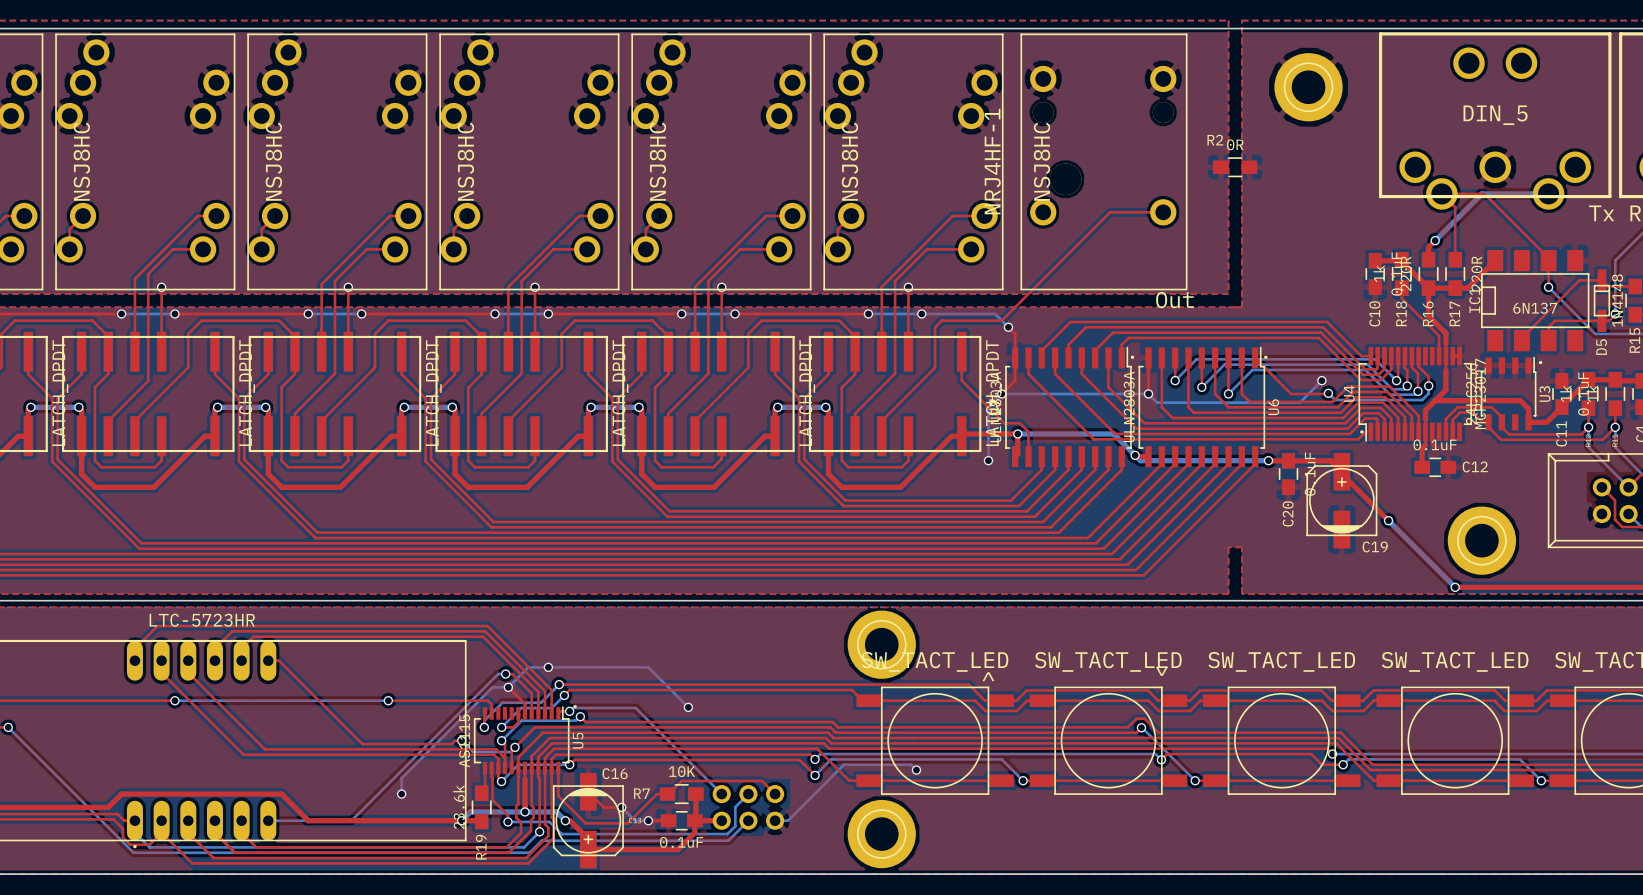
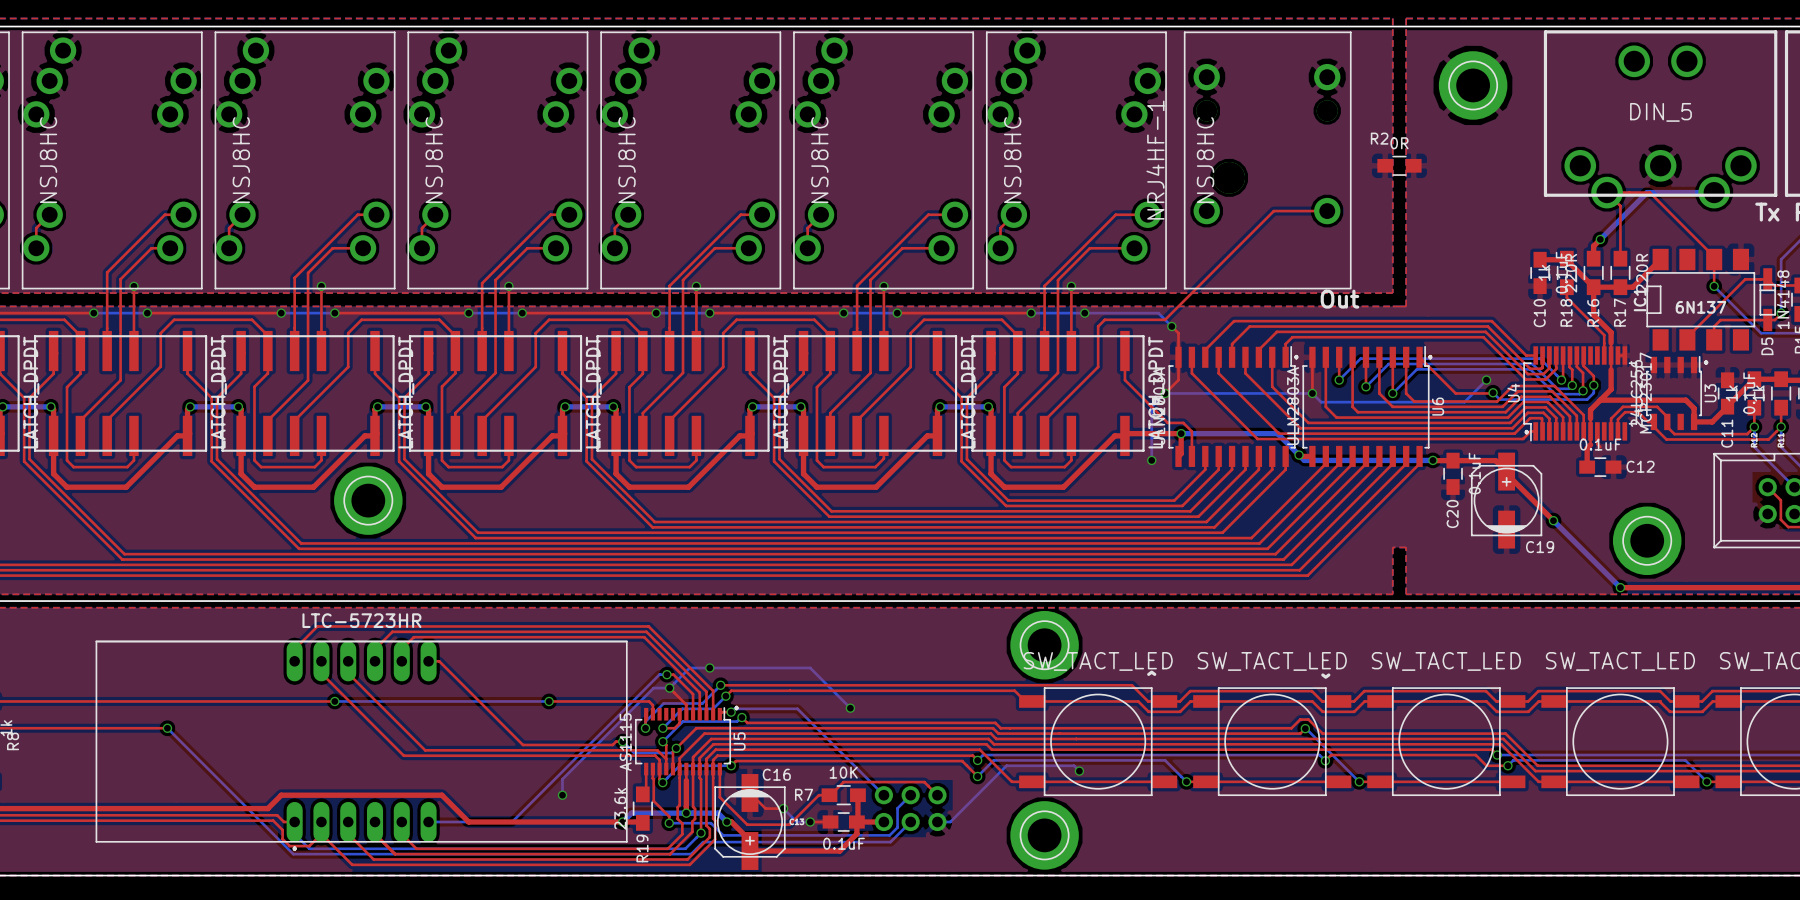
part: none -> (368, 500)

